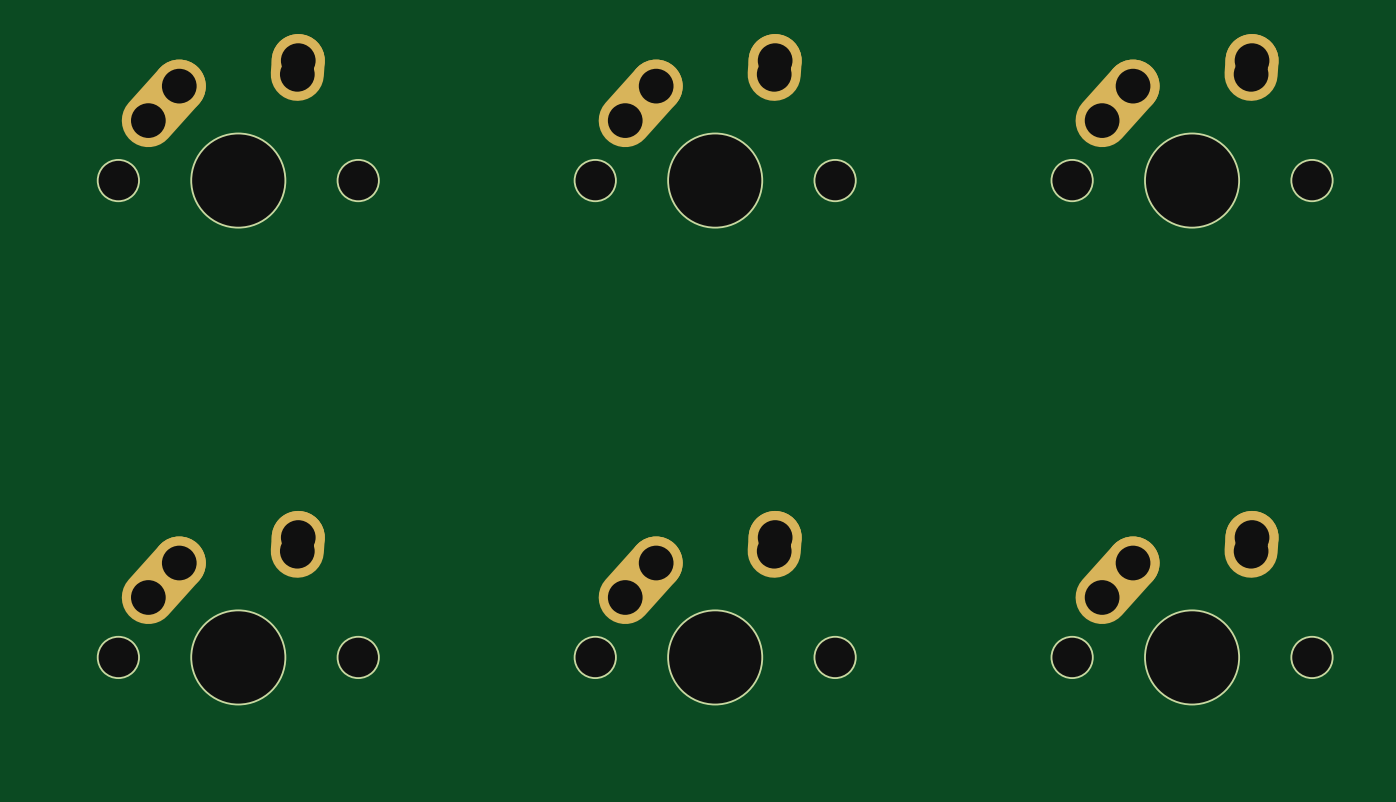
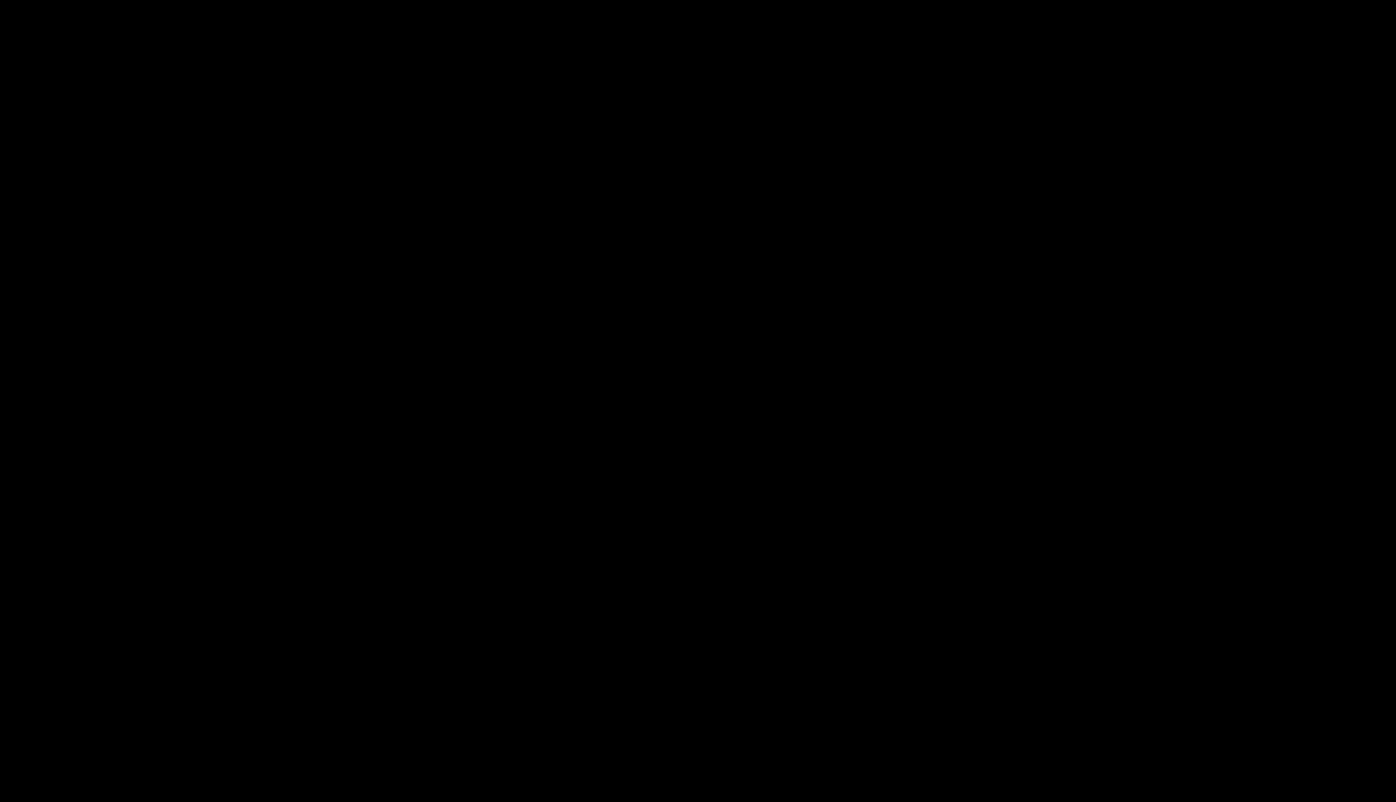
part: (238, 130) -> none
part: (715, 130) -> none
part: (1192, 130) -> none
part: (238, 607) -> none
part: (715, 607) -> none
part: (1192, 607) -> none

